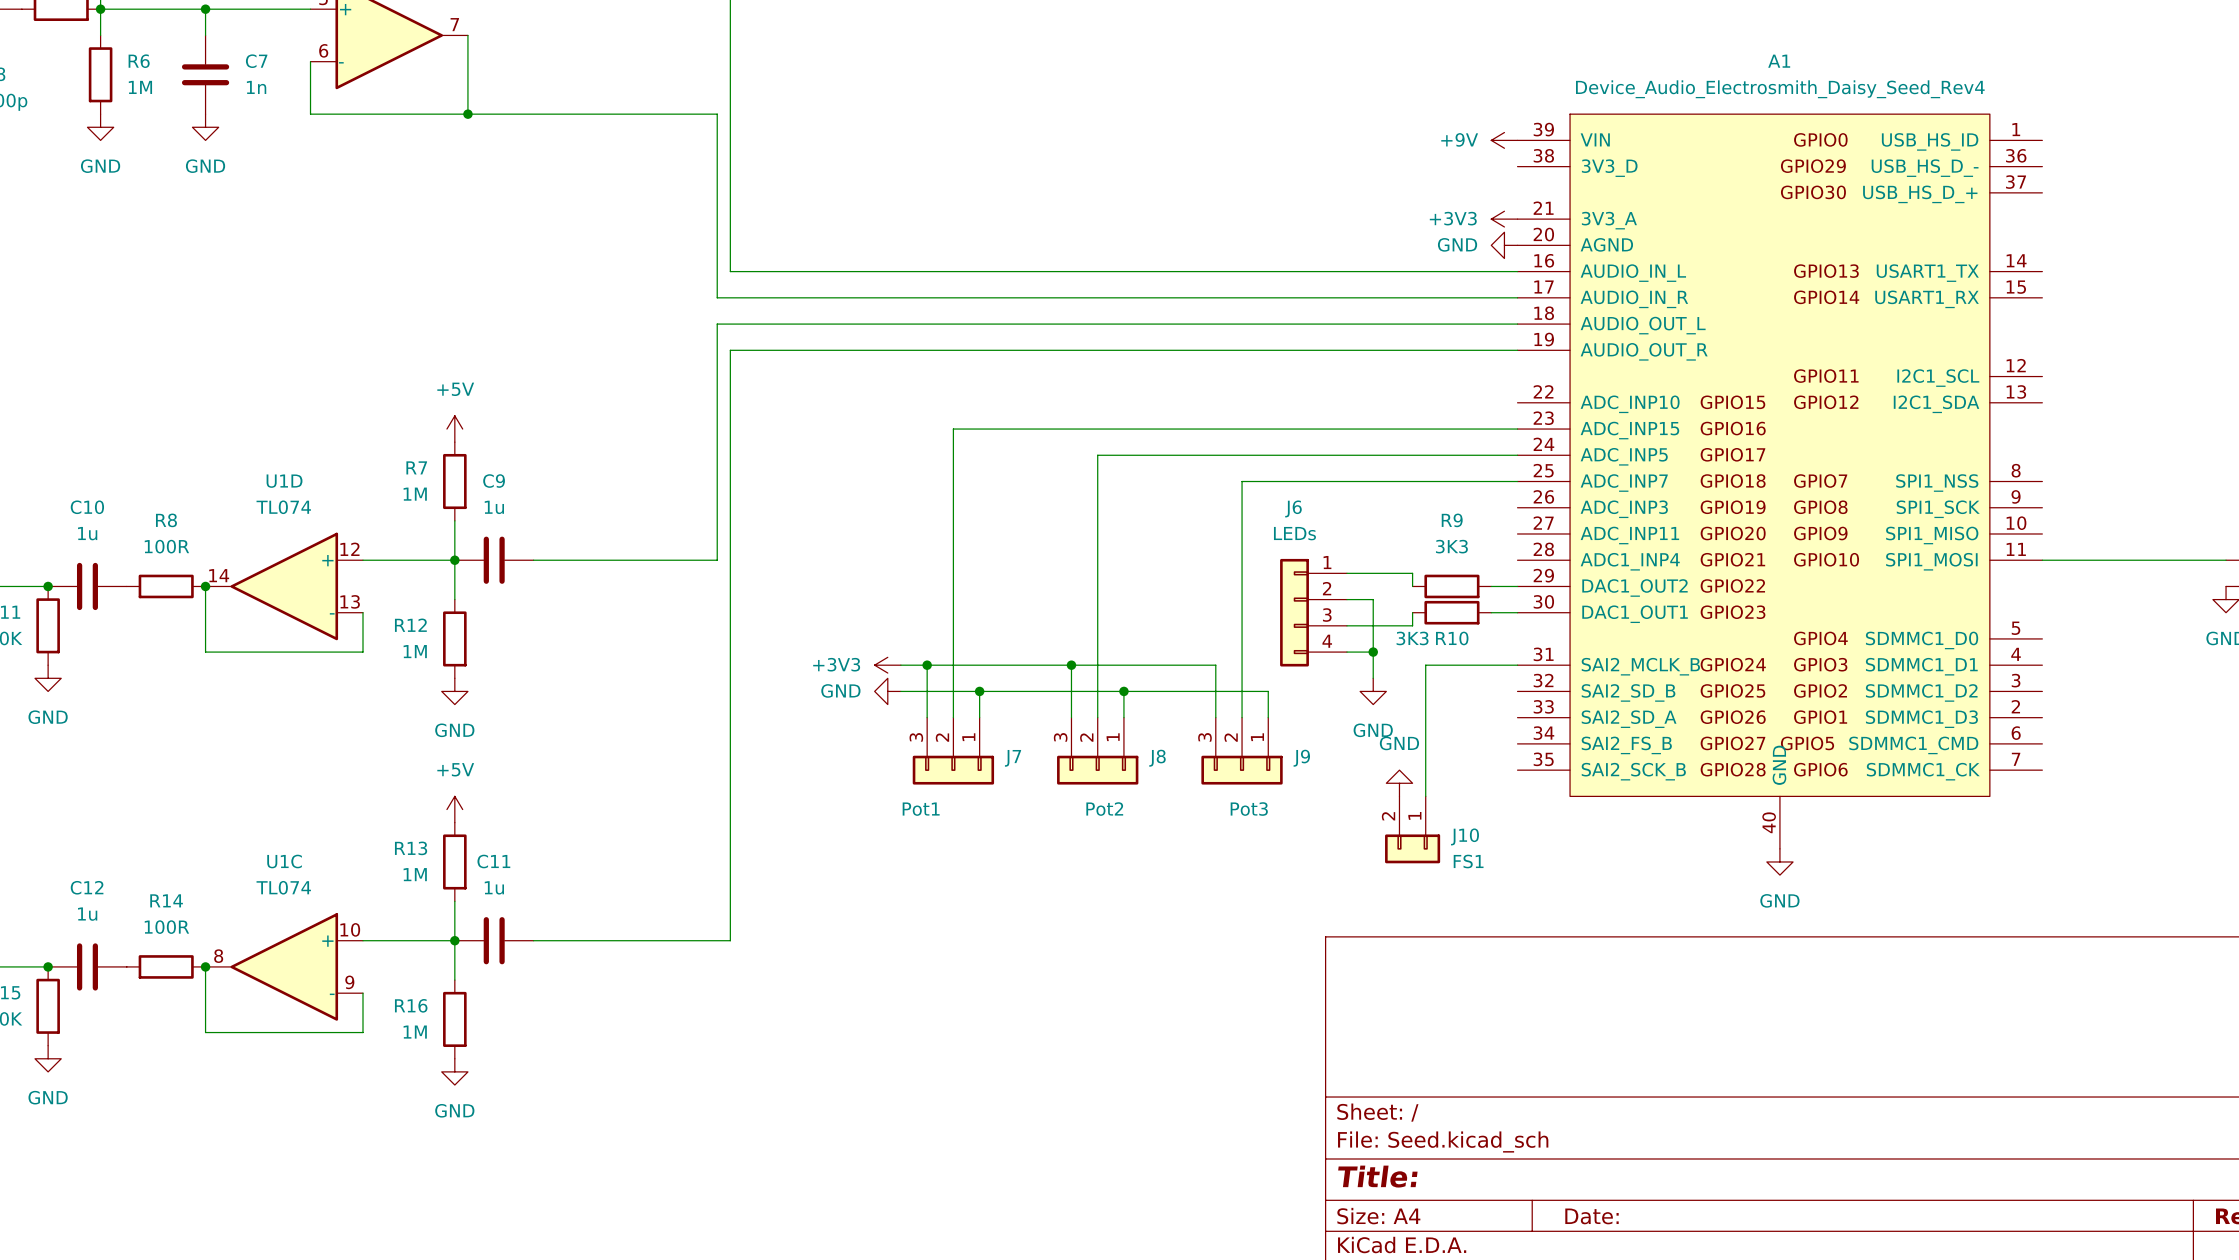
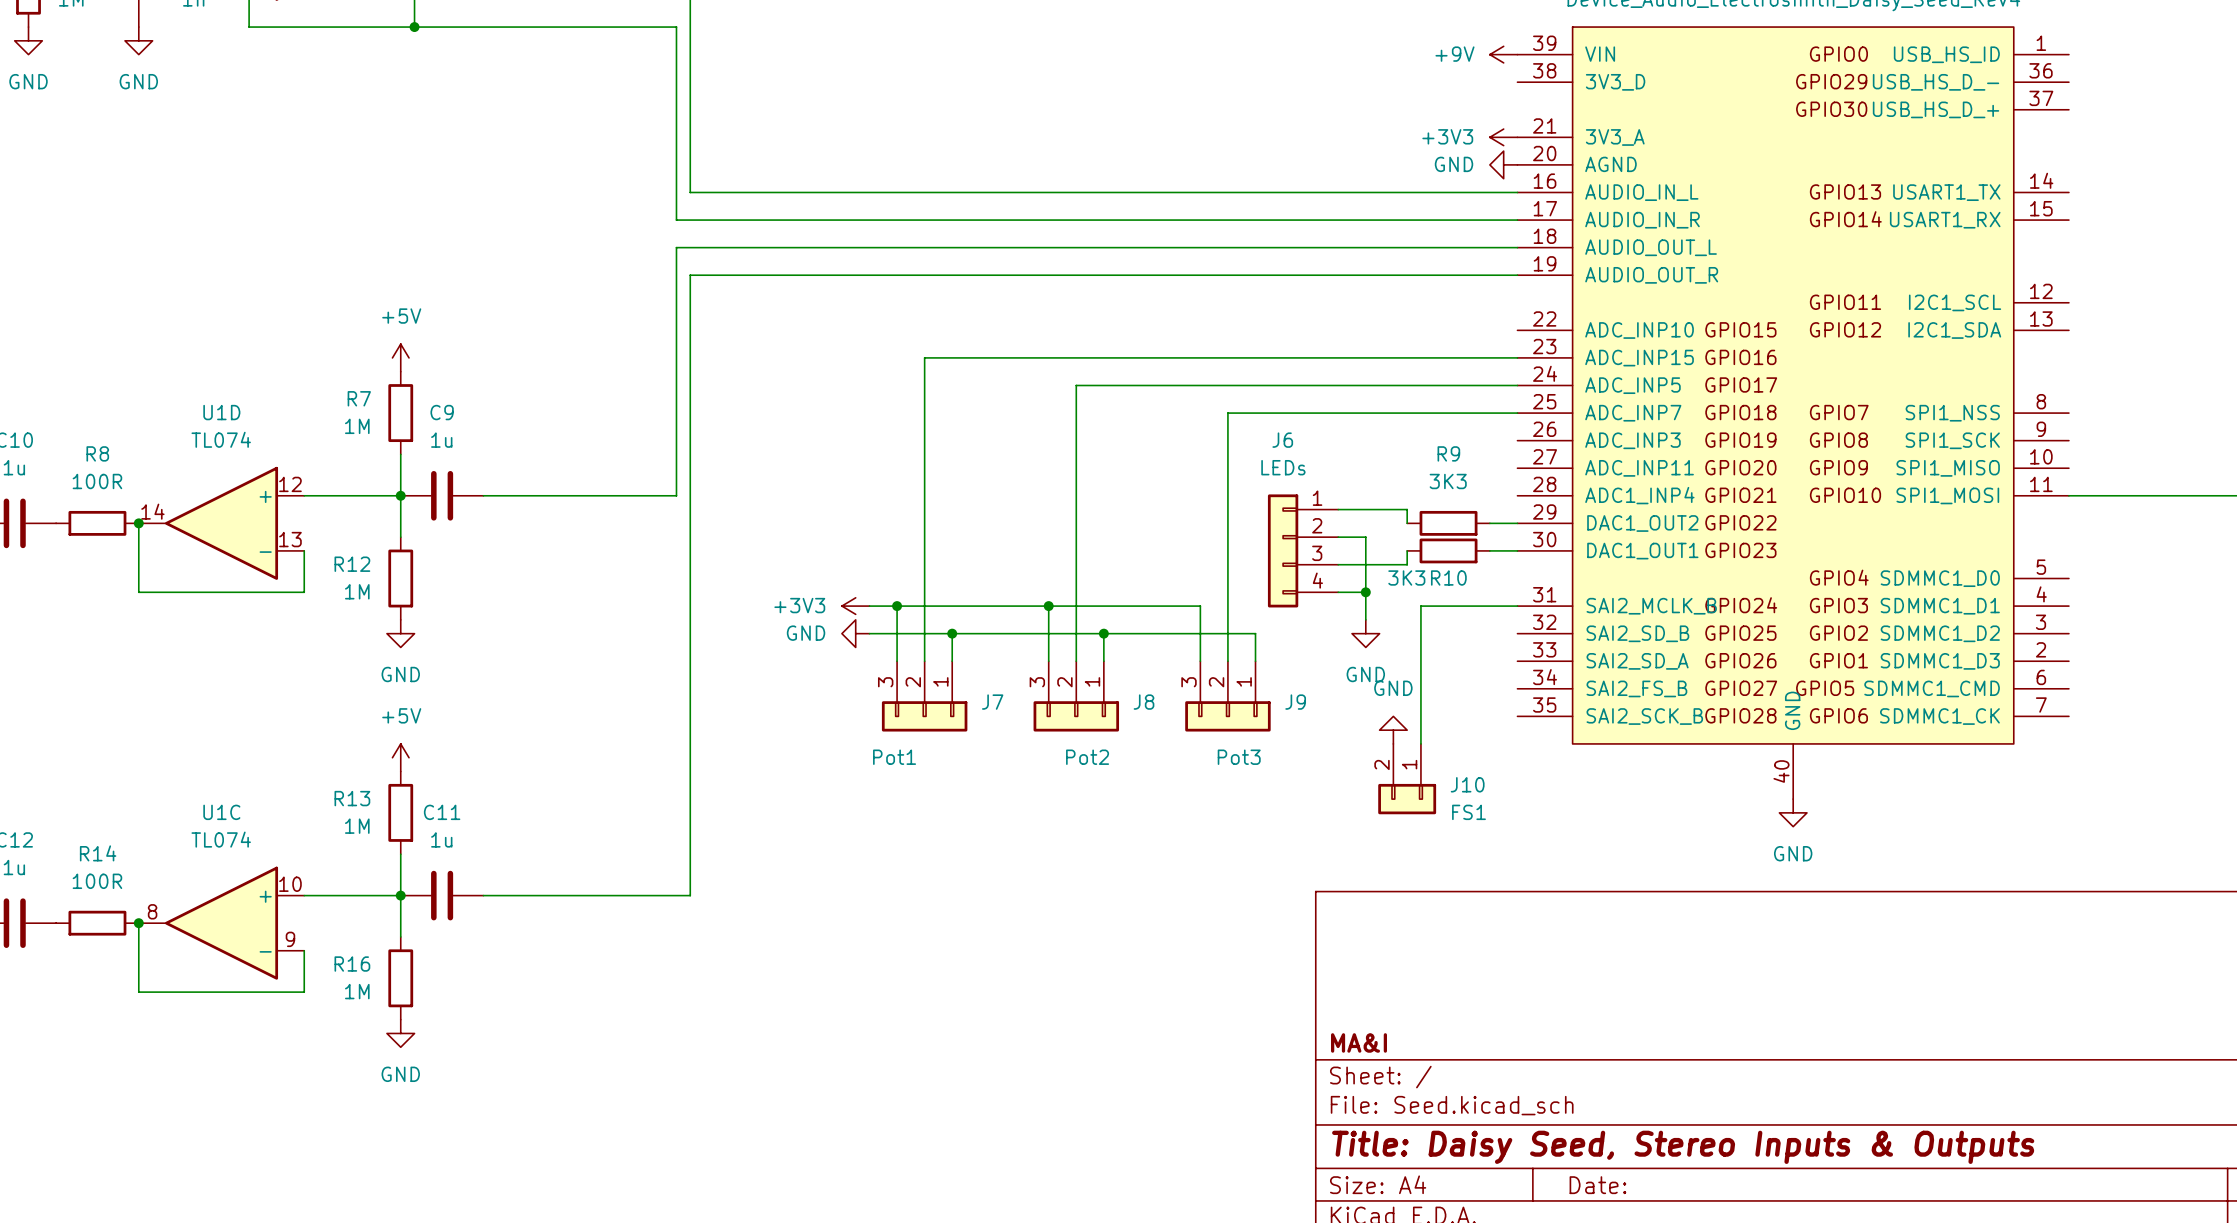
title block: none -> MA&I (1359, 1042)
title block: Title: (1377, 1176) -> Title: Daisy Seed, Stereo Inputs & Outputs (1683, 1147)

